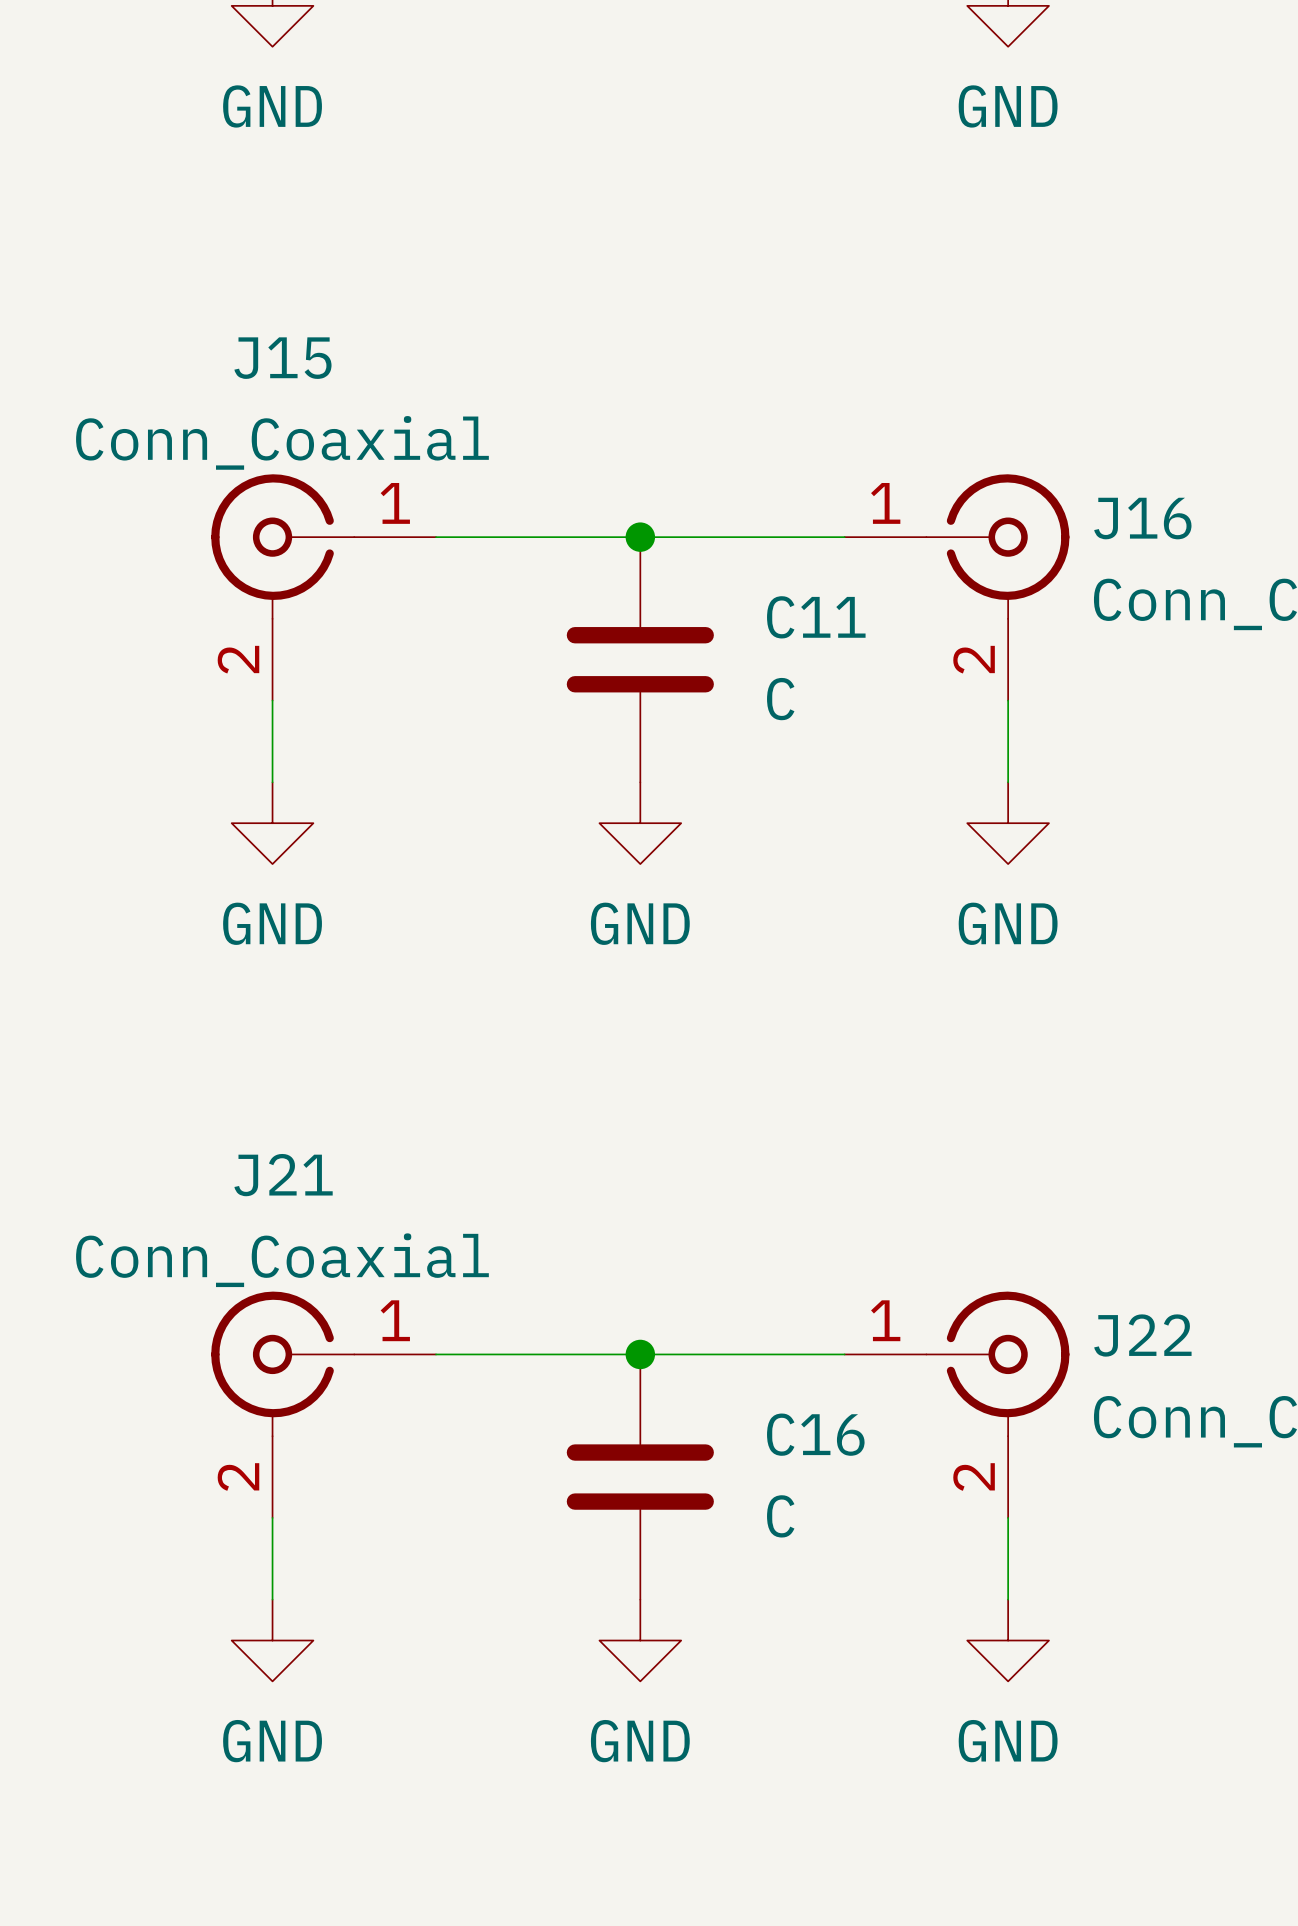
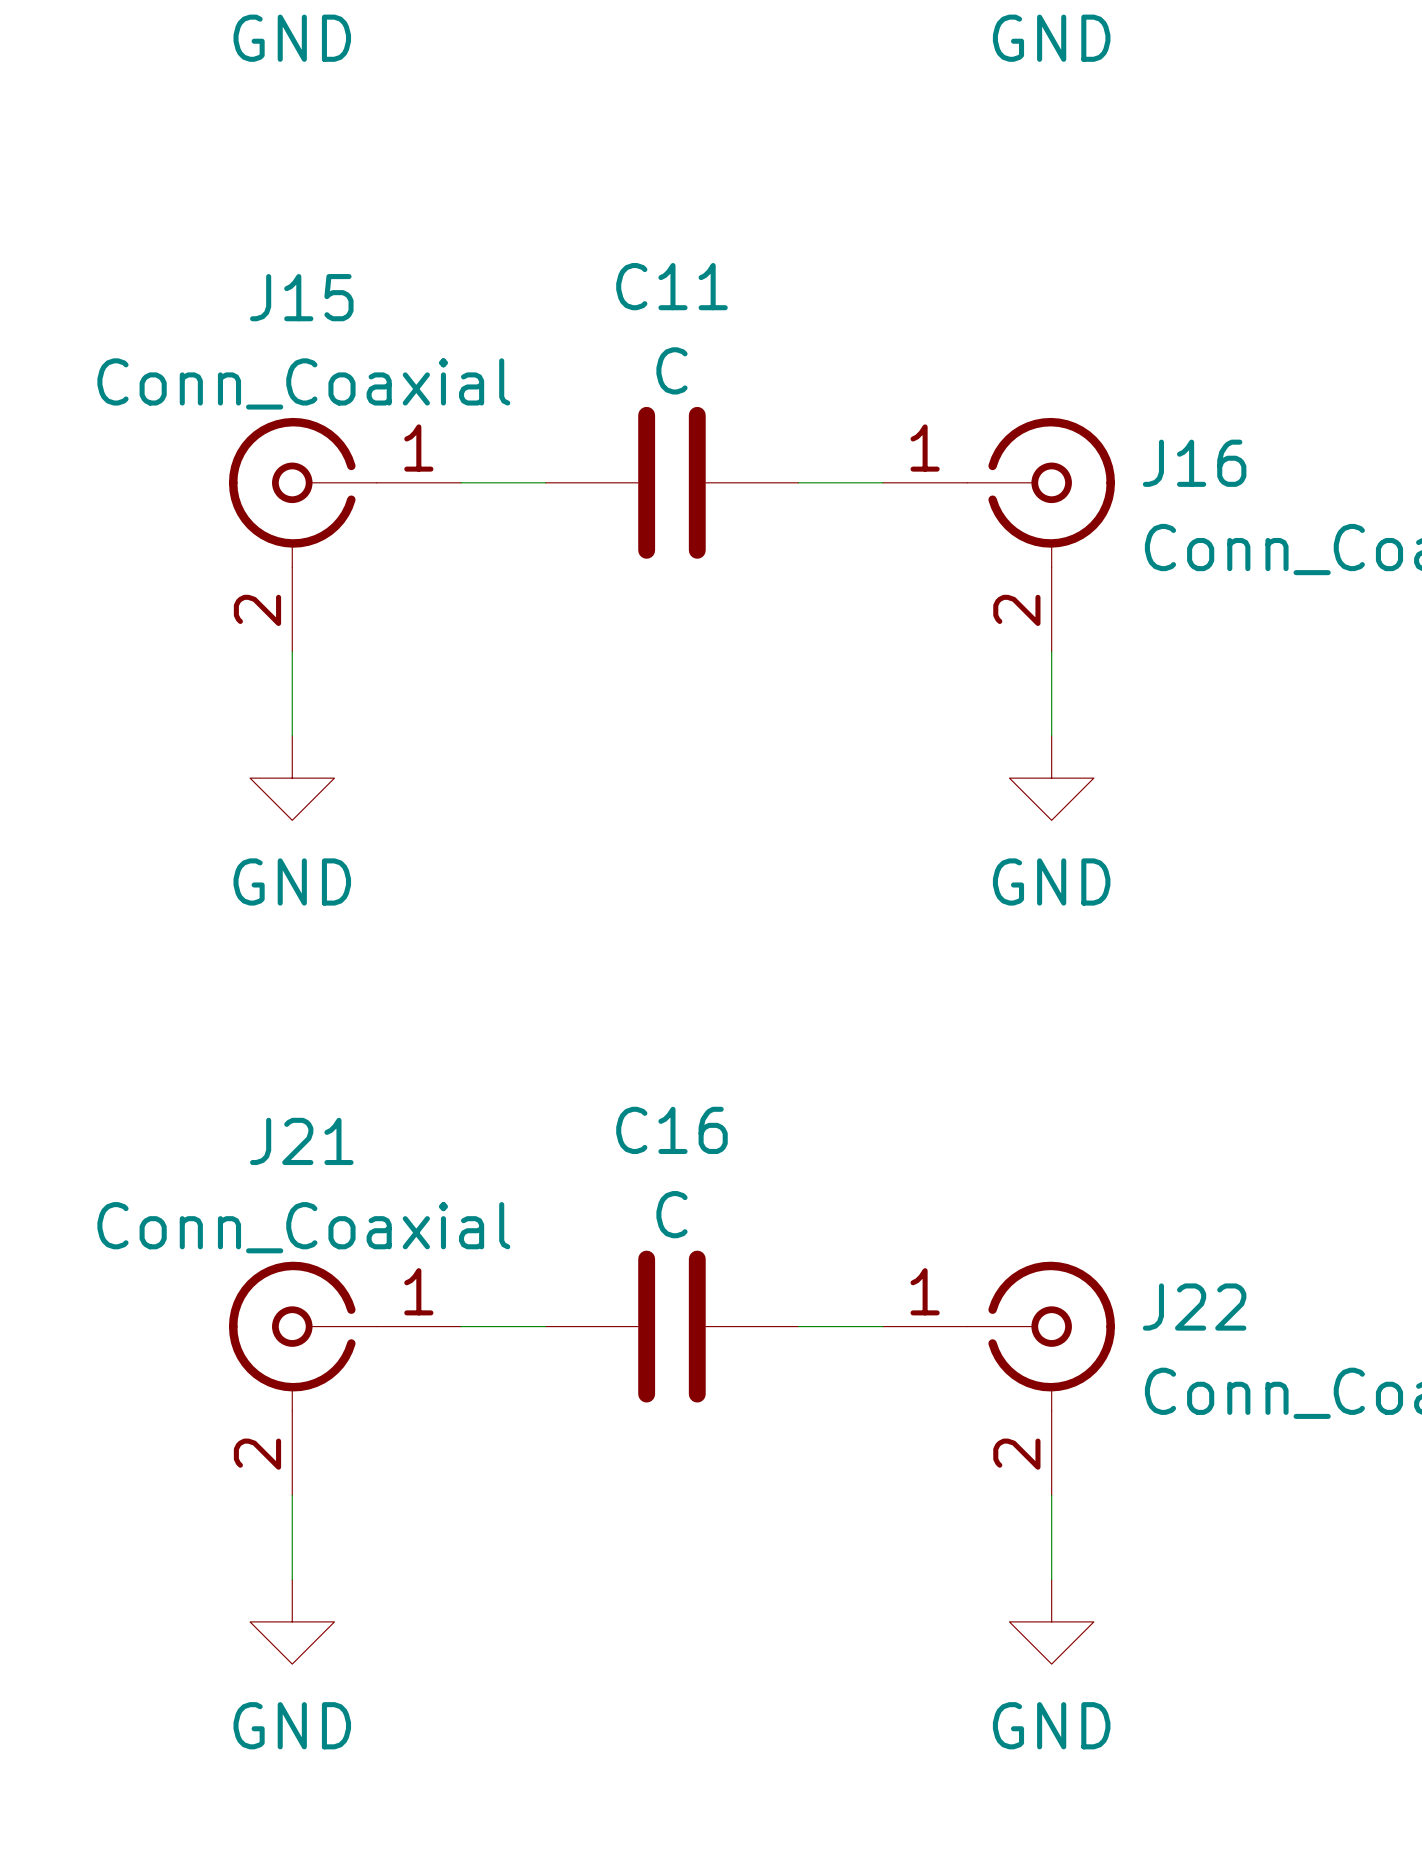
junction: (640, 537) -> none
C11 name position: C11 (816, 617) -> C11 (671, 286)
C11 rotation: 0° (640, 659) -> 90° clockwise (671, 482)
C11 value position: C (780, 699) -> C (671, 370)
power symbol: GND (640, 823) -> none
junction: (640, 1354) -> none
C16 name position: C16 (815, 1434) -> C16 (671, 1130)
C16 rotation: 0° (640, 1477) -> 90° clockwise (671, 1326)
C16 value position: C (780, 1516) -> C (671, 1214)
power symbol: GND (640, 1640) -> none

